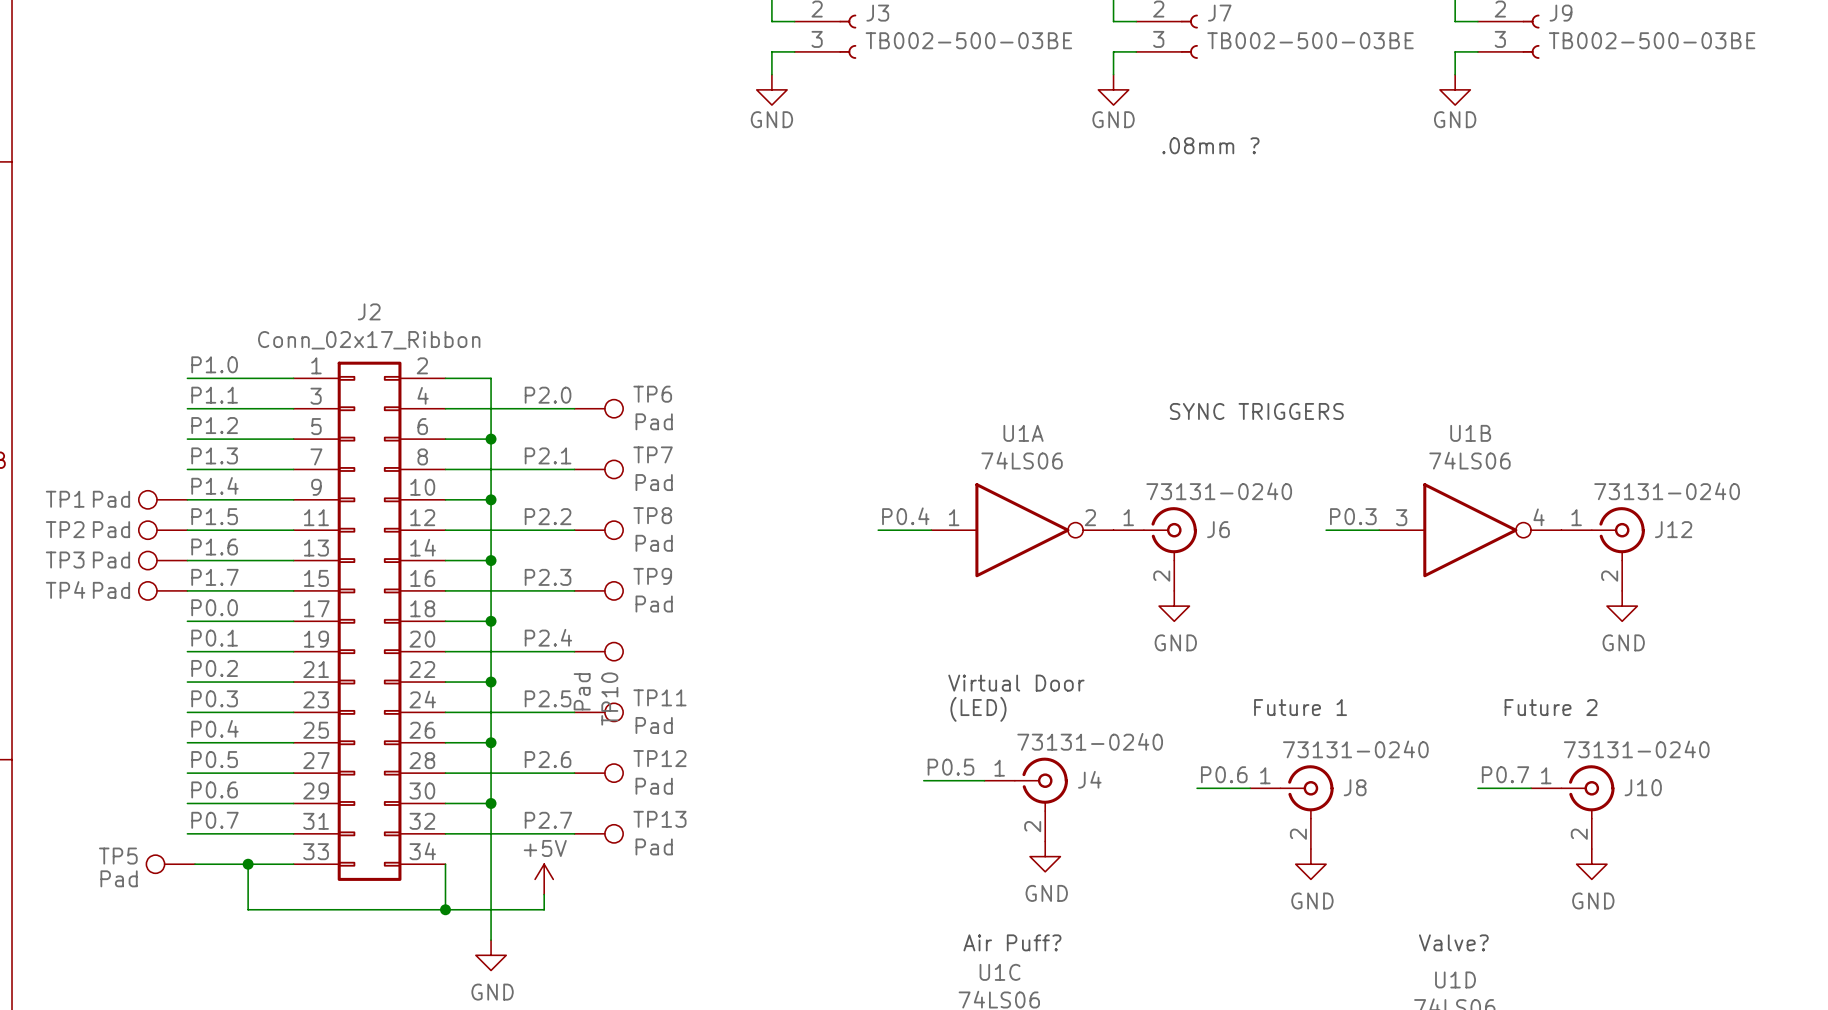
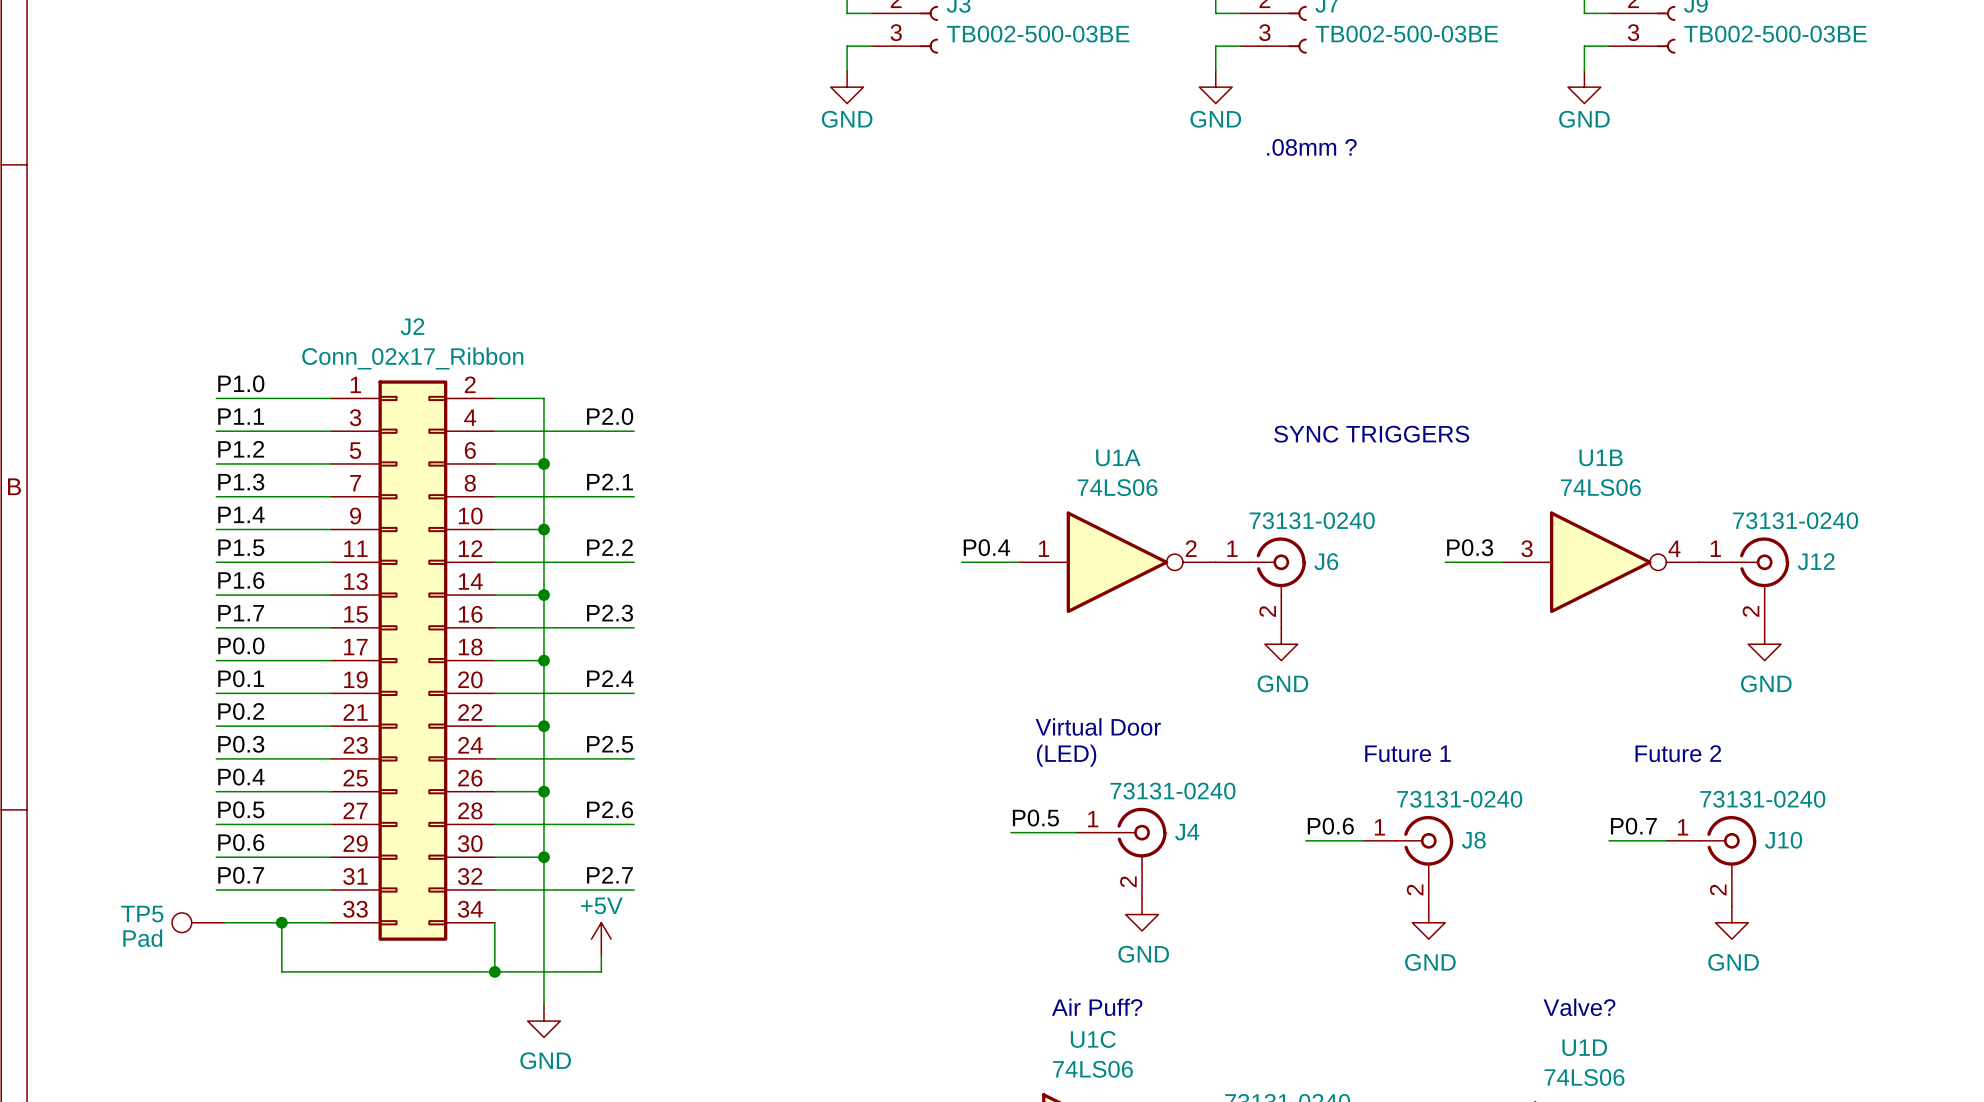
TP6: Pad (598, 408) -> none
TP7: Pad (598, 469) -> none
TP1: Pad (163, 499) -> none
TP2: Pad (163, 530) -> none
TP8: Pad (598, 530) -> none
TP3: Pad (163, 560) -> none
TP4: Pad (163, 590) -> none
TP9: Pad (598, 590) -> none
TP10: Pad (598, 651) -> none
TP11: Pad (598, 712) -> none
TP12: Pad (598, 773) -> none
TP13: Pad (598, 833) -> none

